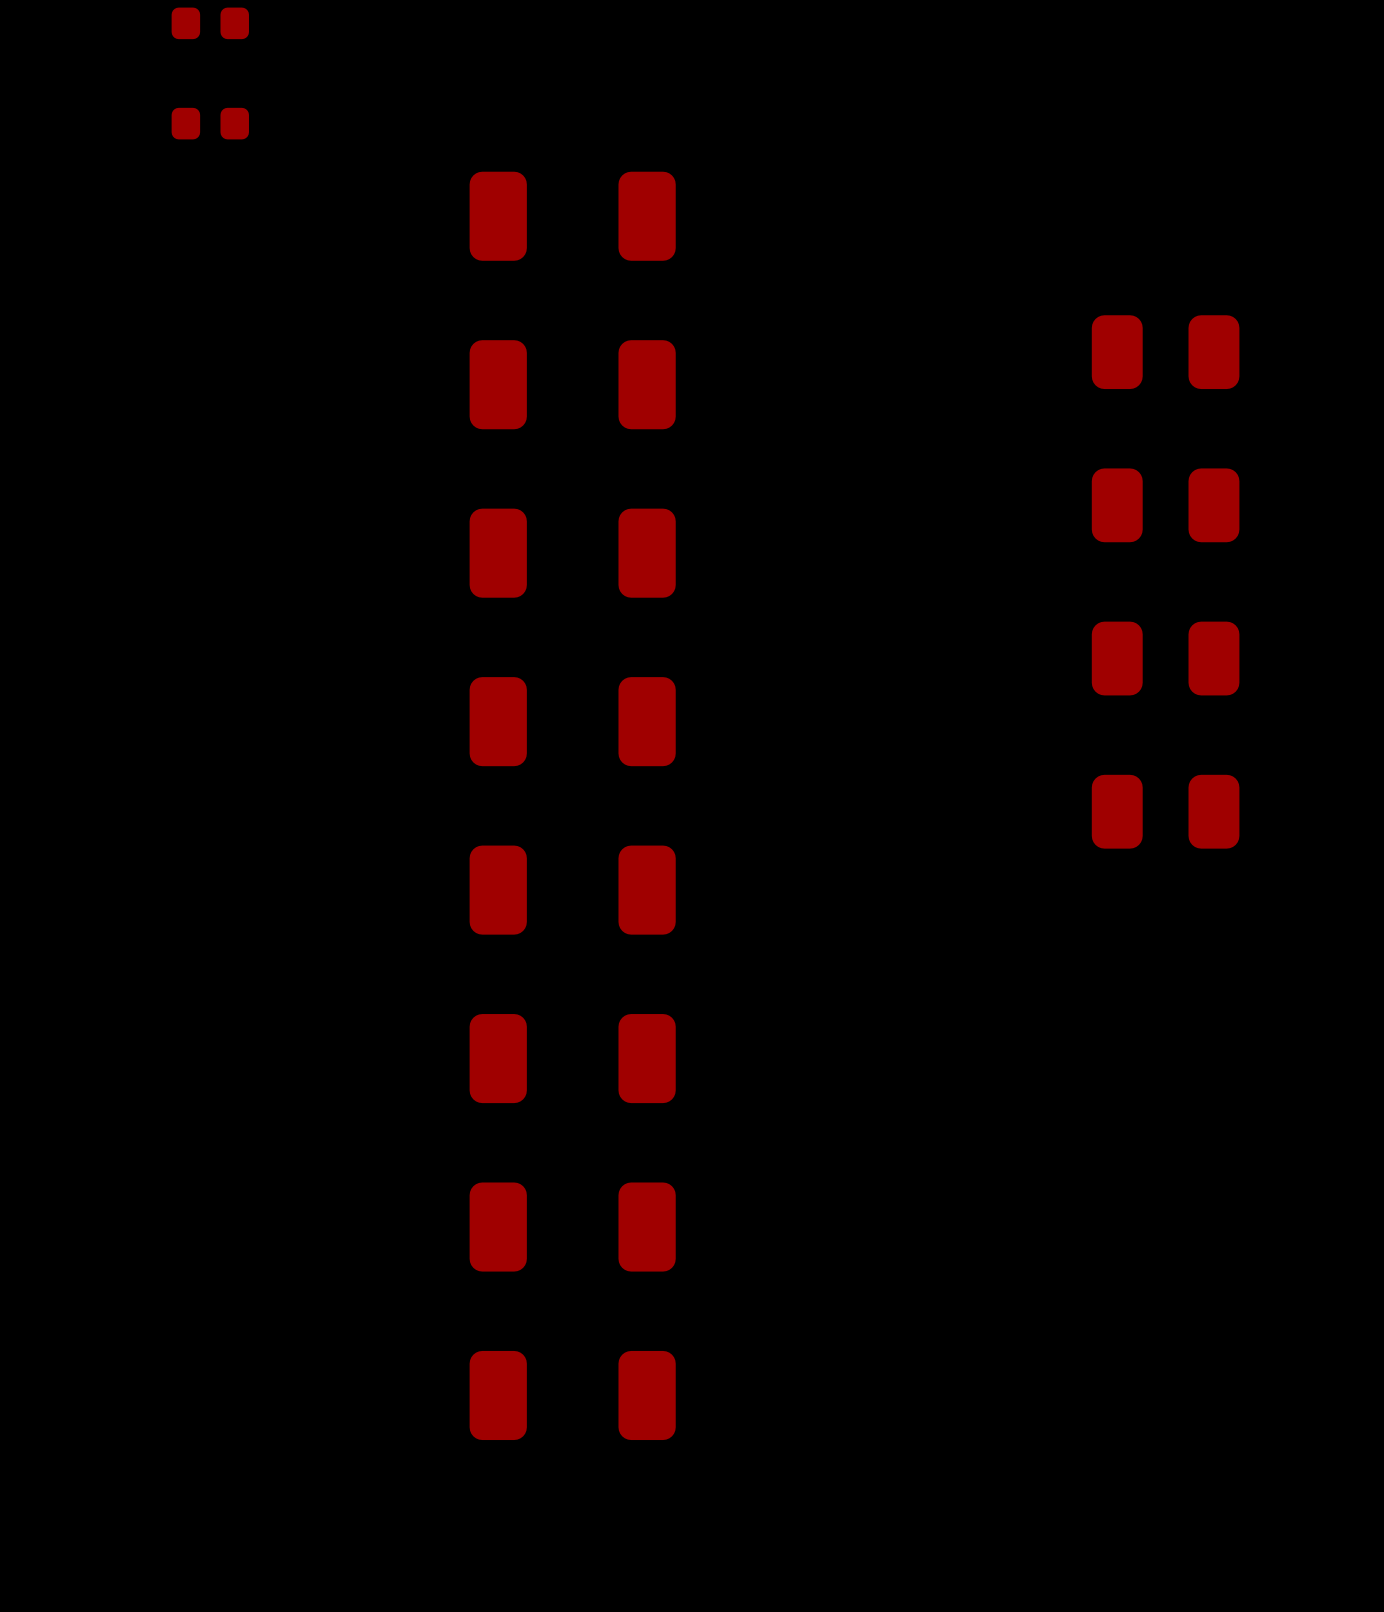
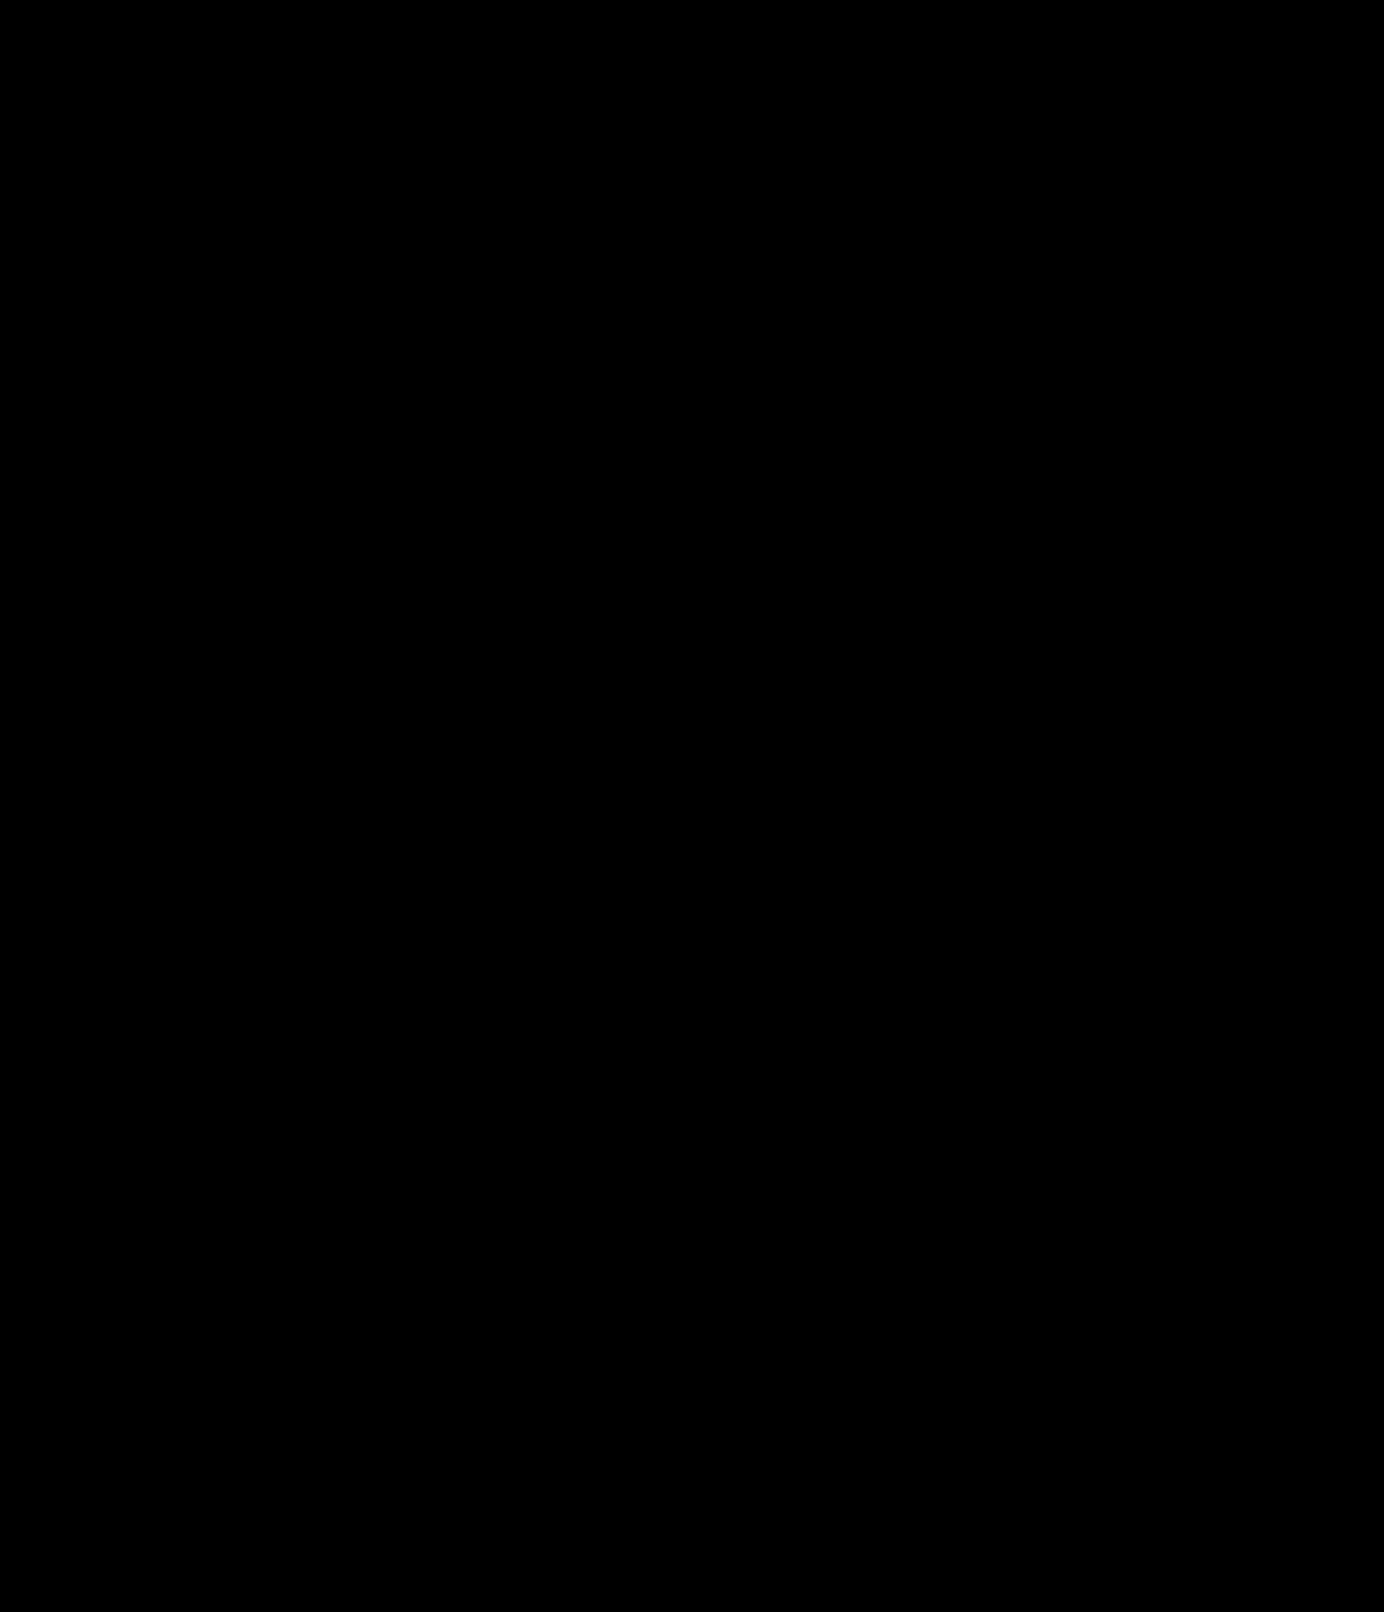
part: (210, 23) -> none
part: (210, 123) -> none
part: (572, 216) -> none
part: (1165, 352) -> none
part: (572, 384) -> none
part: (1165, 505) -> none
part: (572, 553) -> none
part: (1165, 658) -> none
part: (572, 721) -> none
part: (1165, 811) -> none
part: (572, 890) -> none
part: (572, 1058) -> none
part: (572, 1227) -> none
part: (572, 1395) -> none

